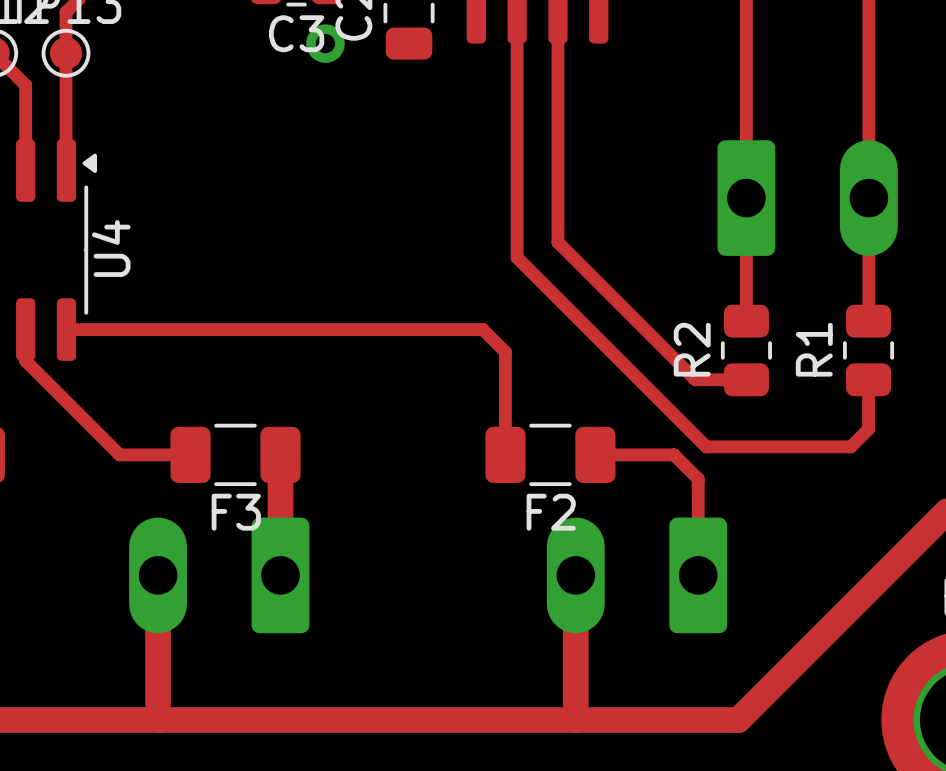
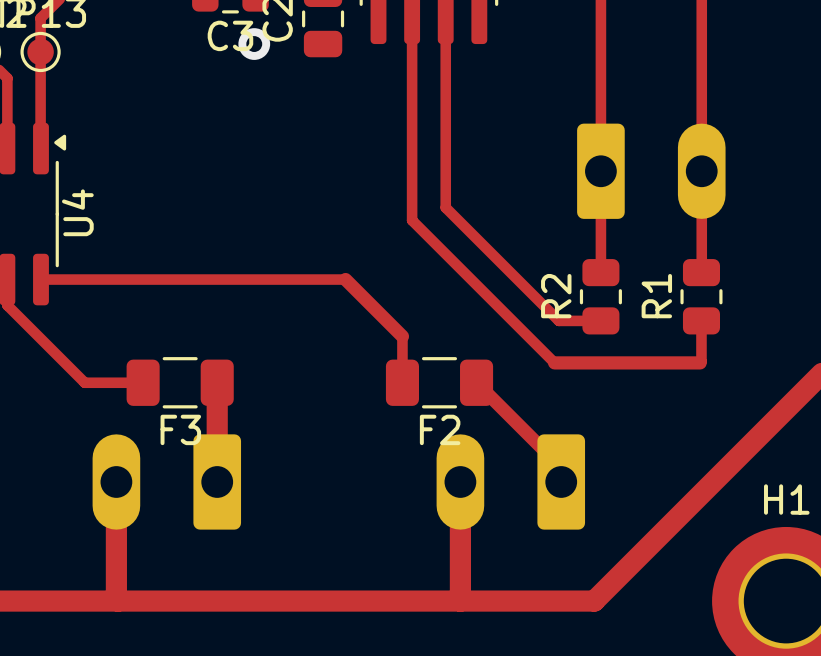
track: (436, 329) (482, 329) (505, 352) (505, 398) -> (345, 279) (402, 336)
track: (690, 430) (706, 446) (850, 446) (866, 430) -> (554, 362) (700, 362)
track: (595, 454) (674, 454) (698, 479) (698, 557) -> (476, 382) (561, 467)

